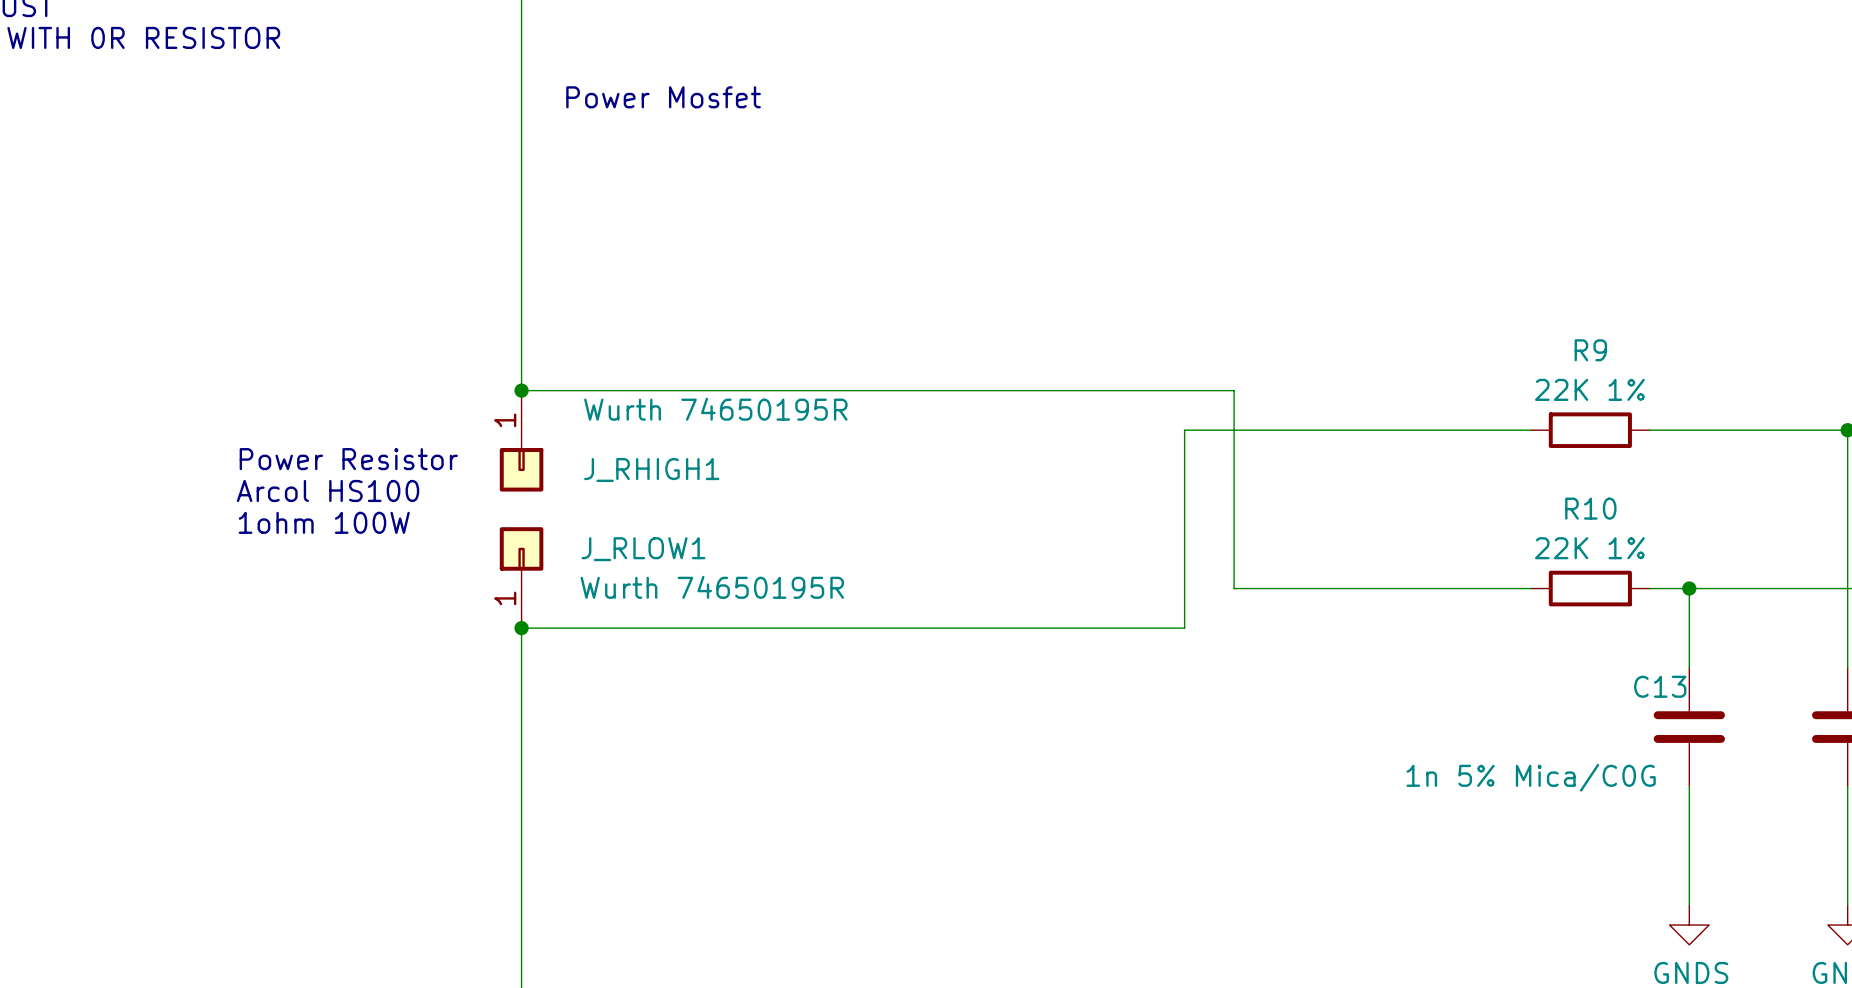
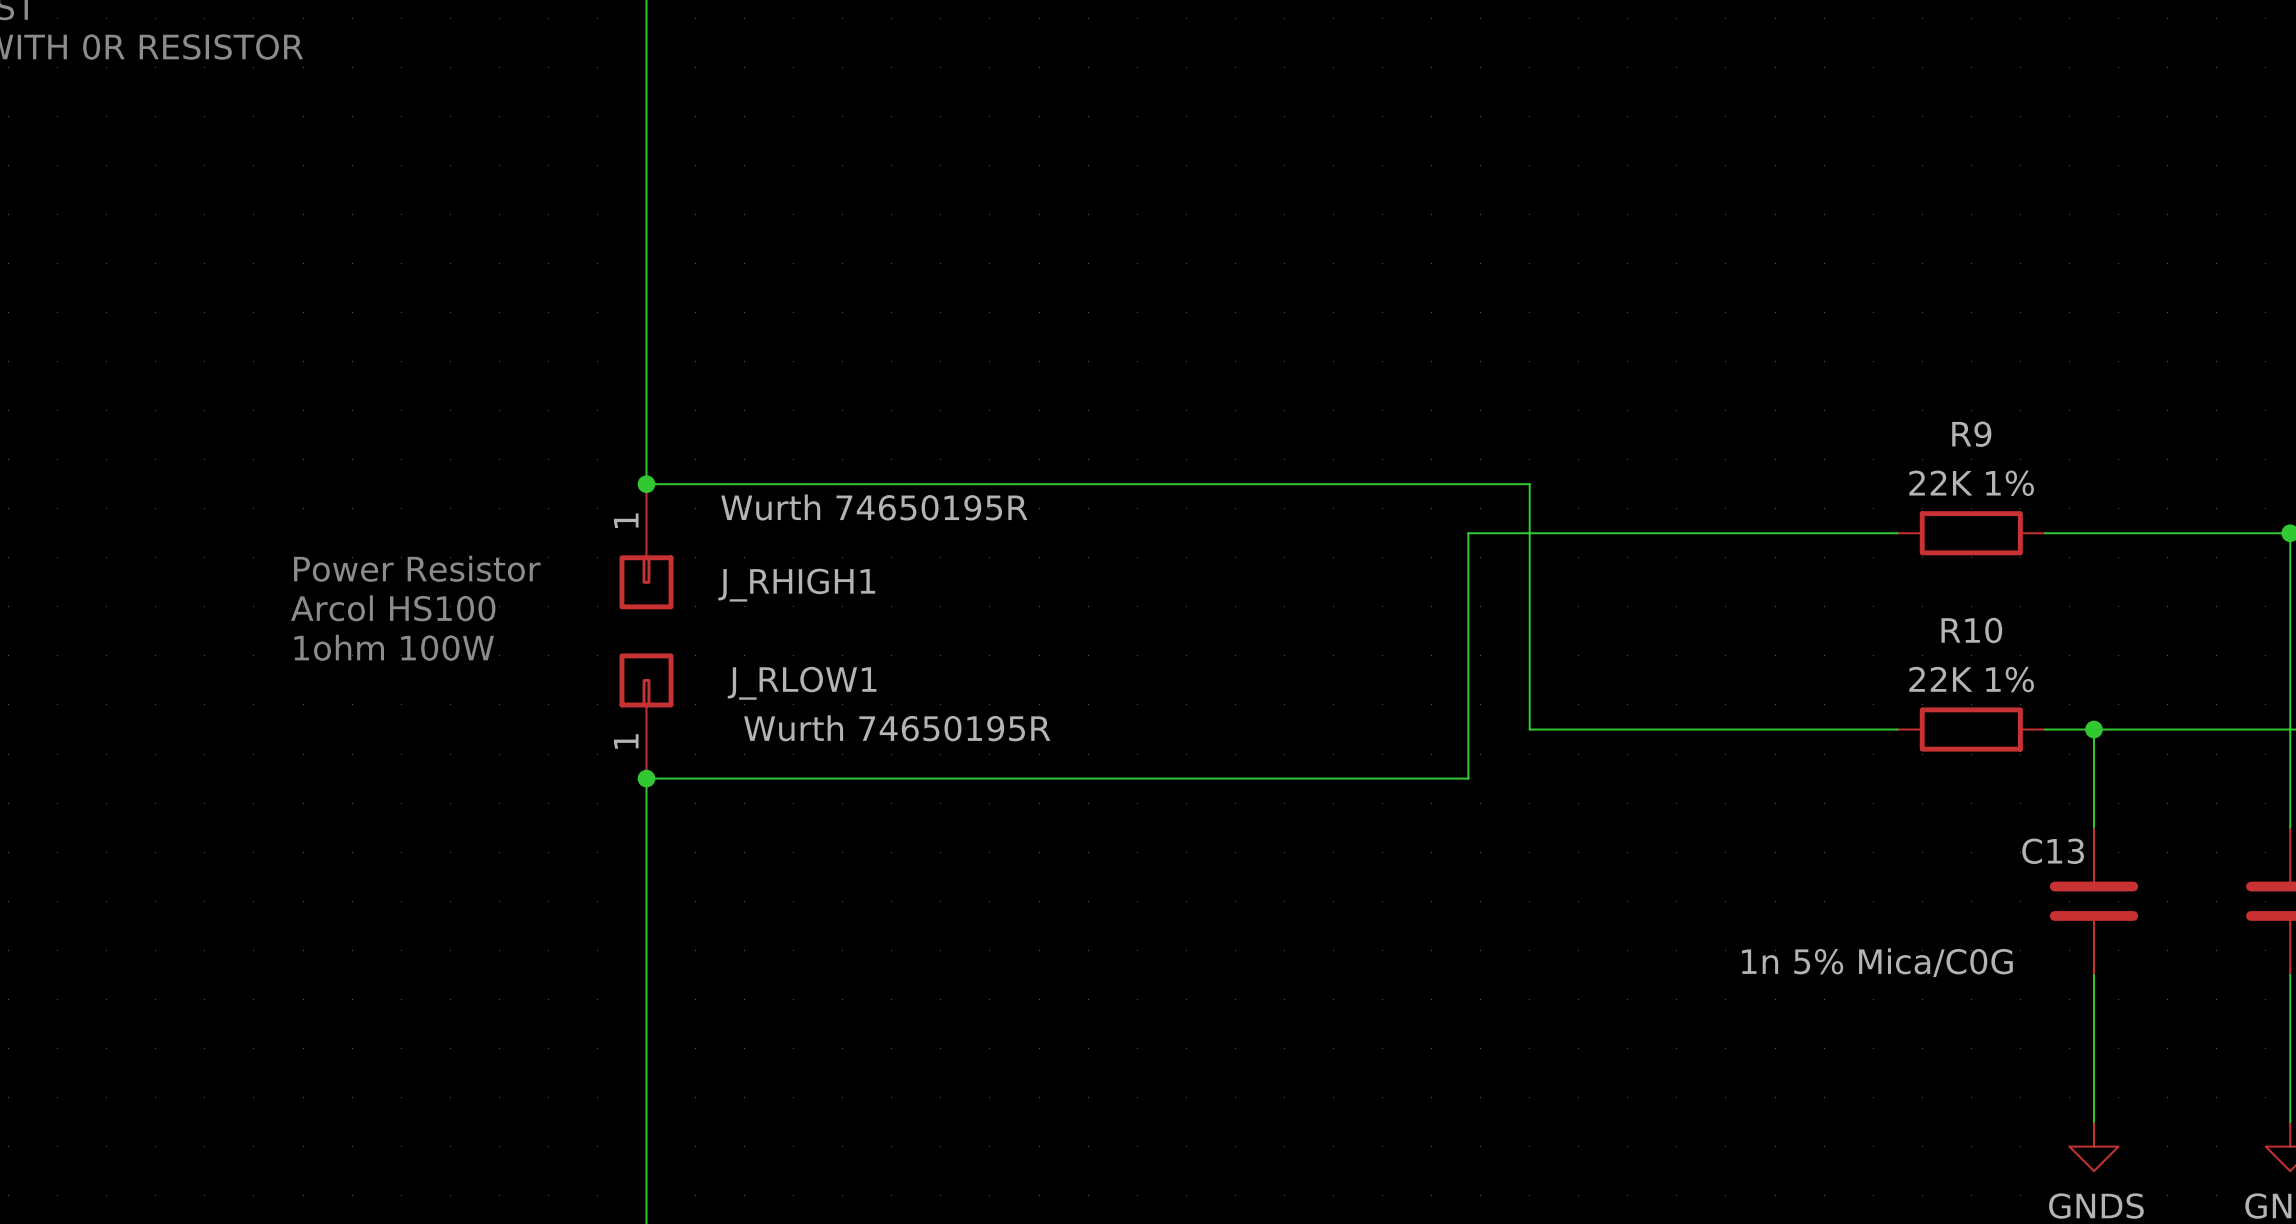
text: Power Mosfet (663, 97) -> none

